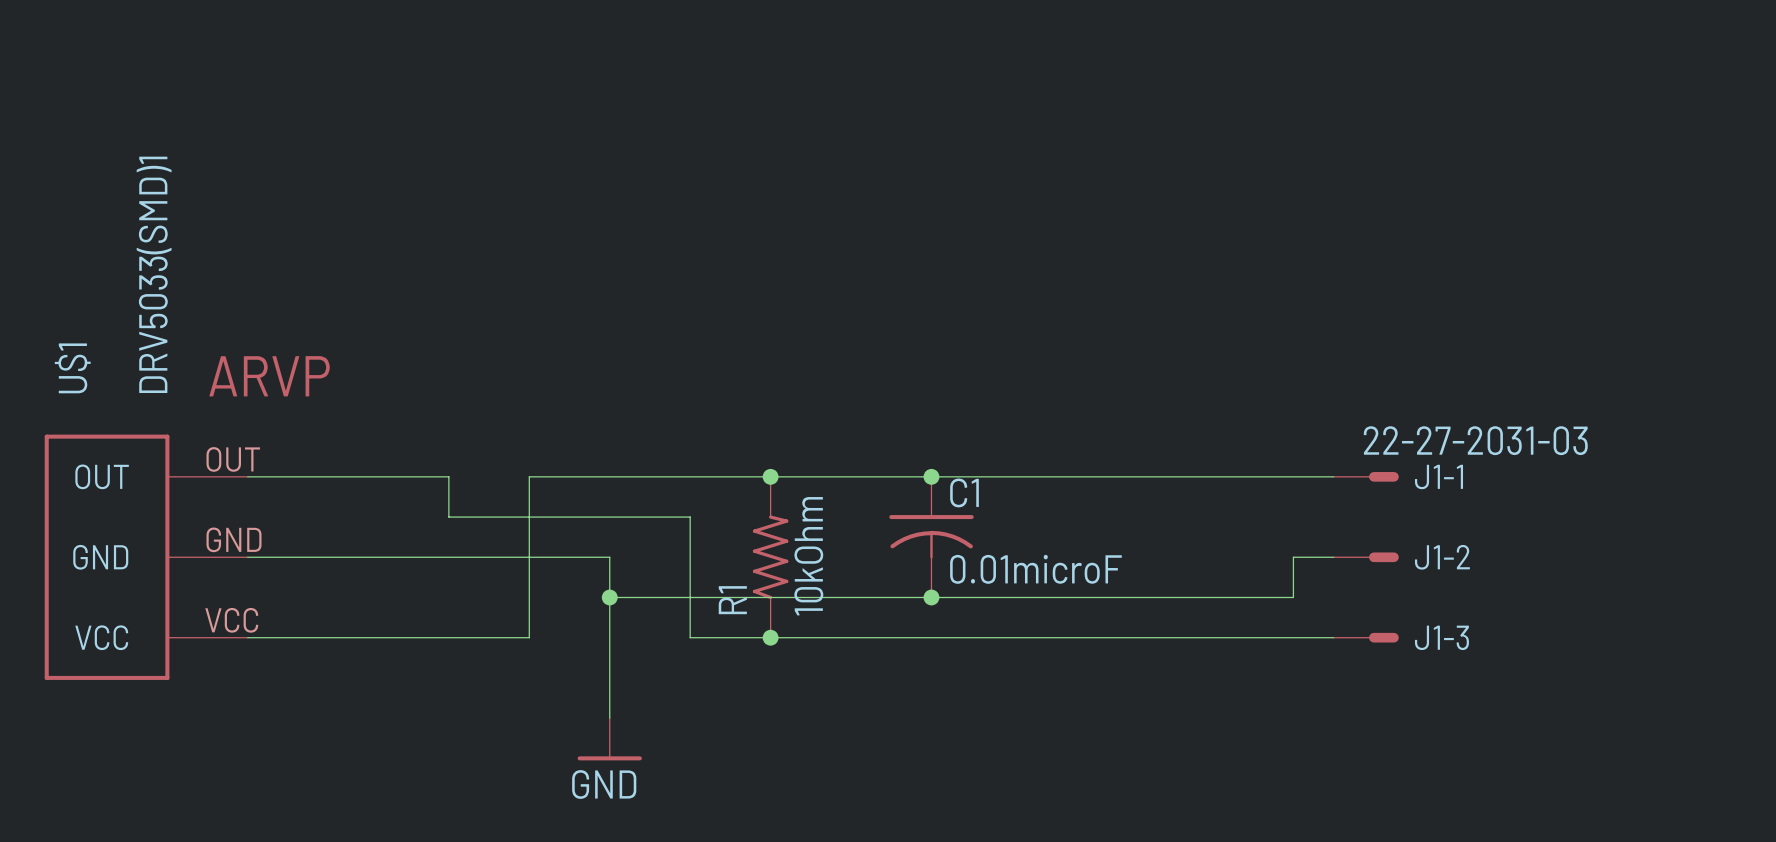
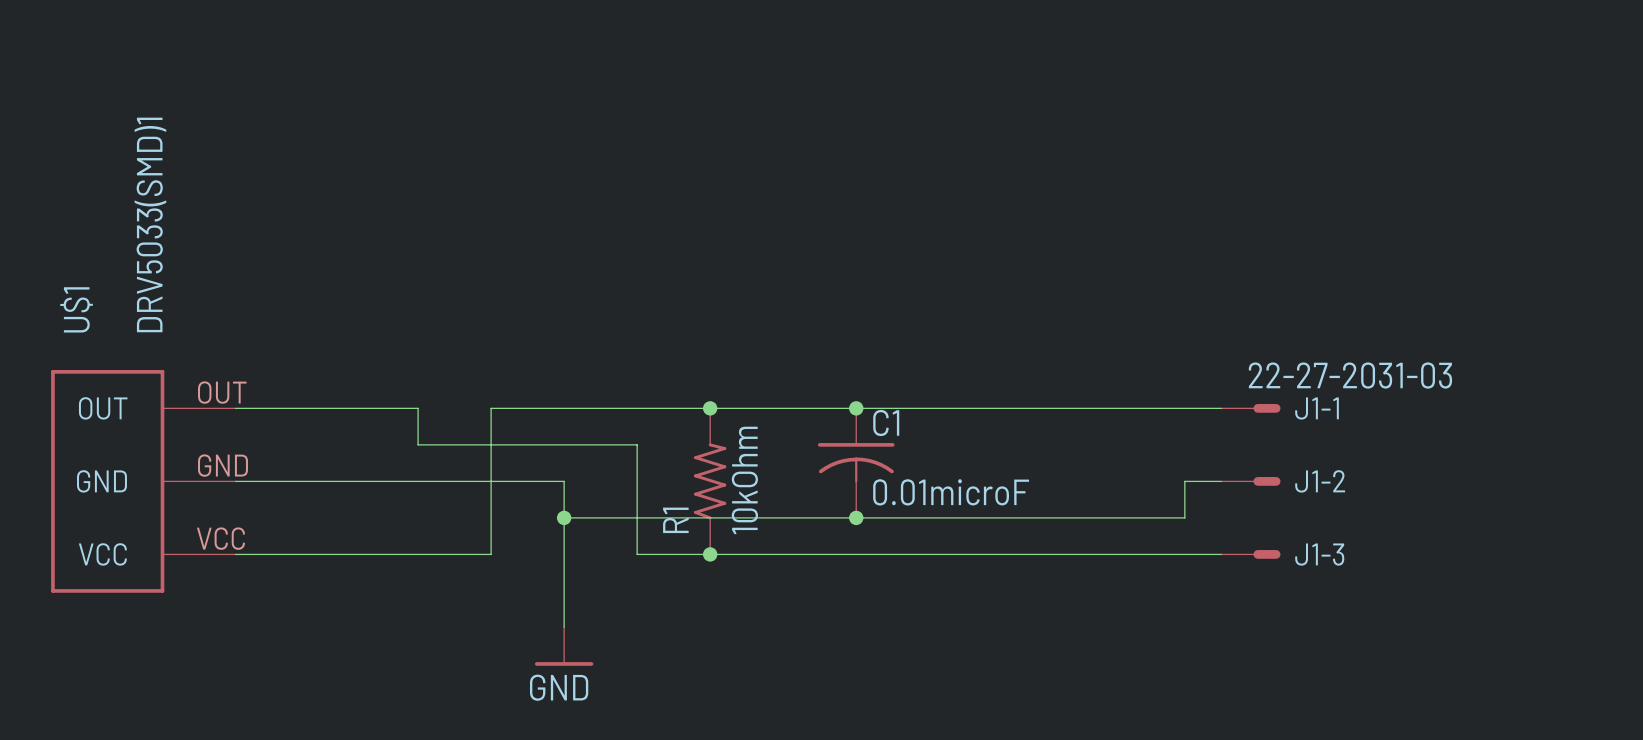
part: (269, 376) -> none

